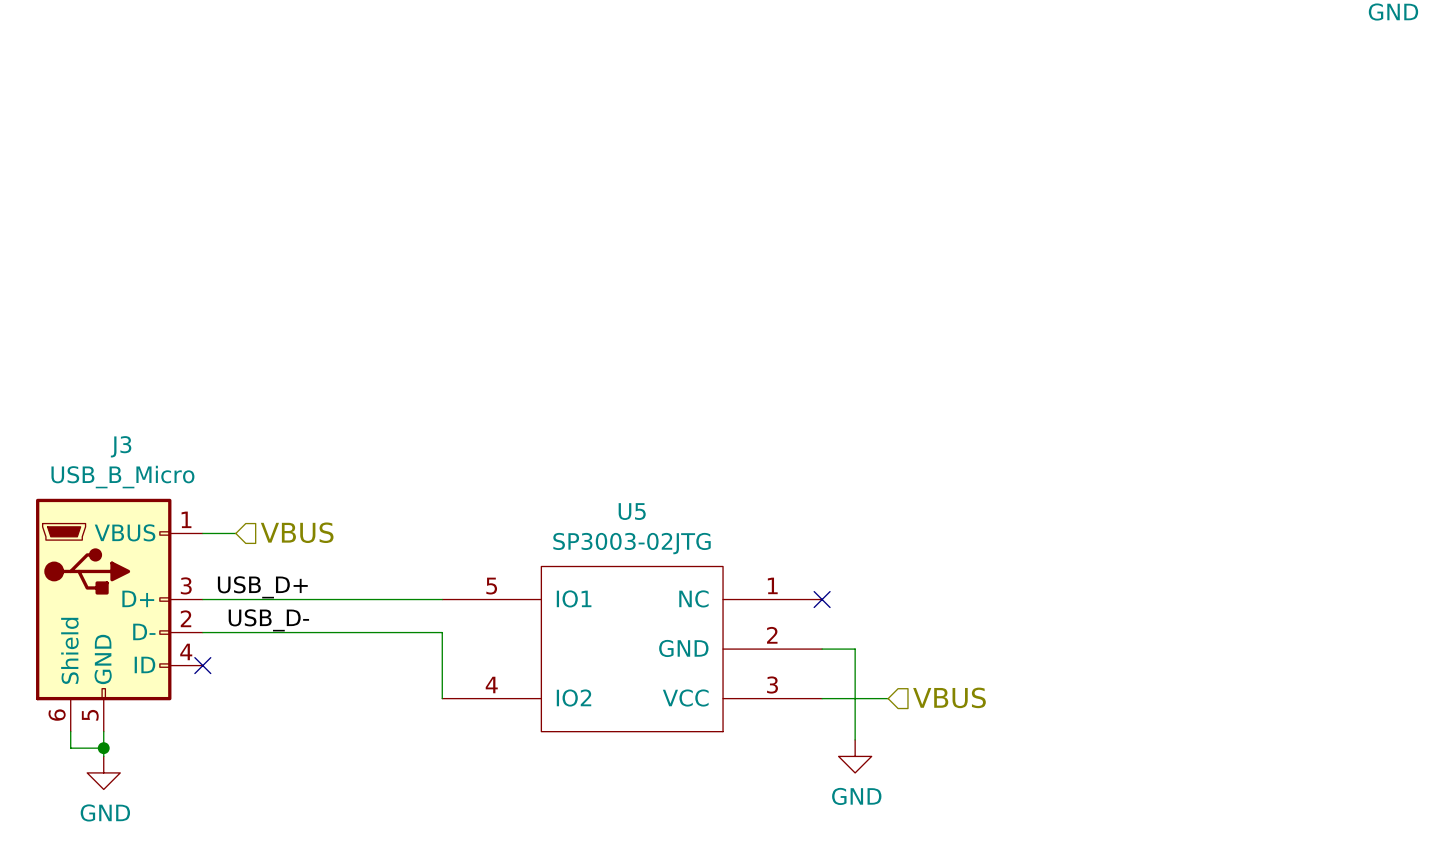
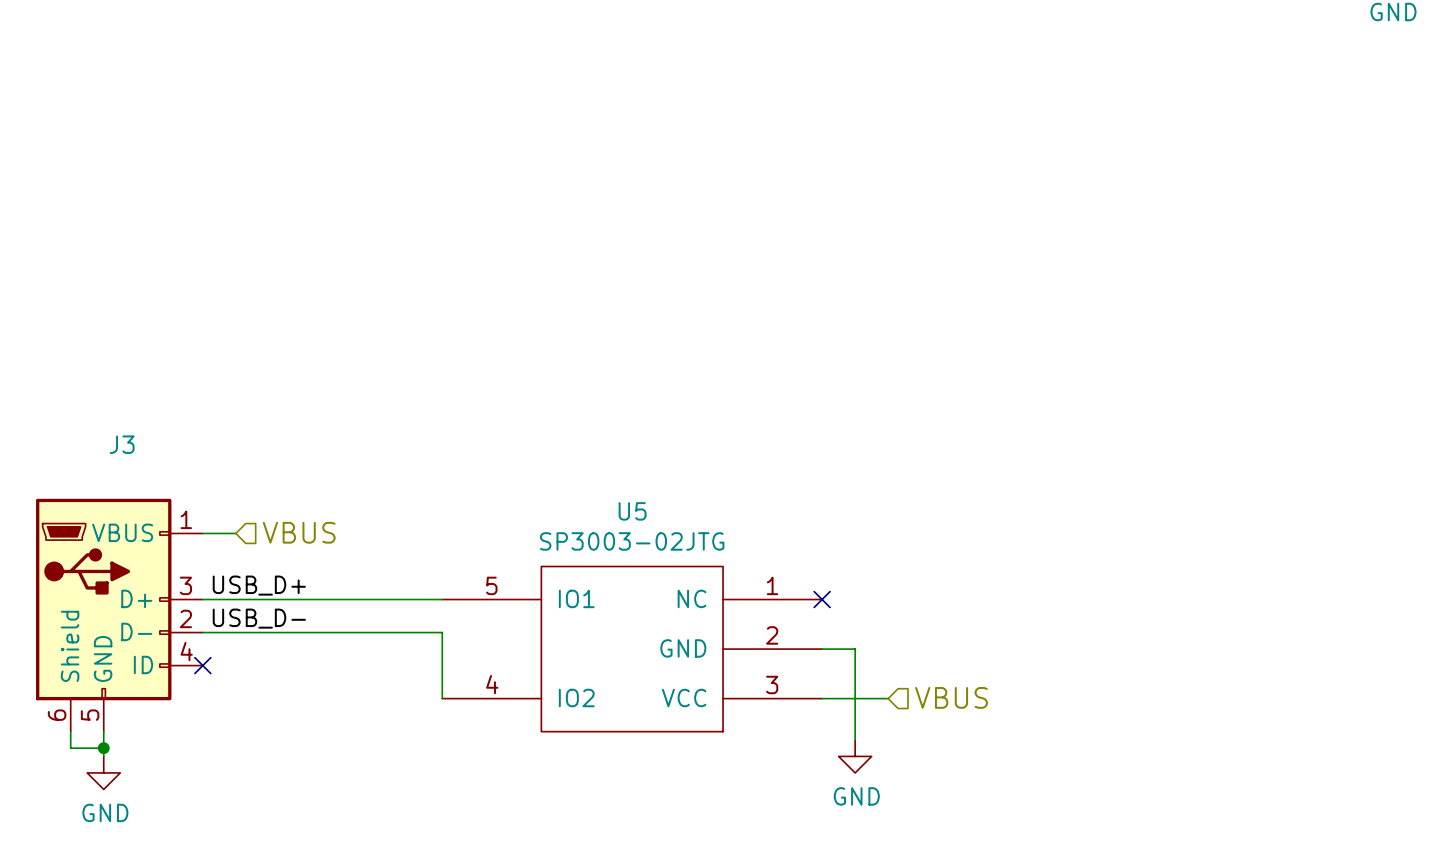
J3 value: USB_B_Micro (122, 477) -> none

